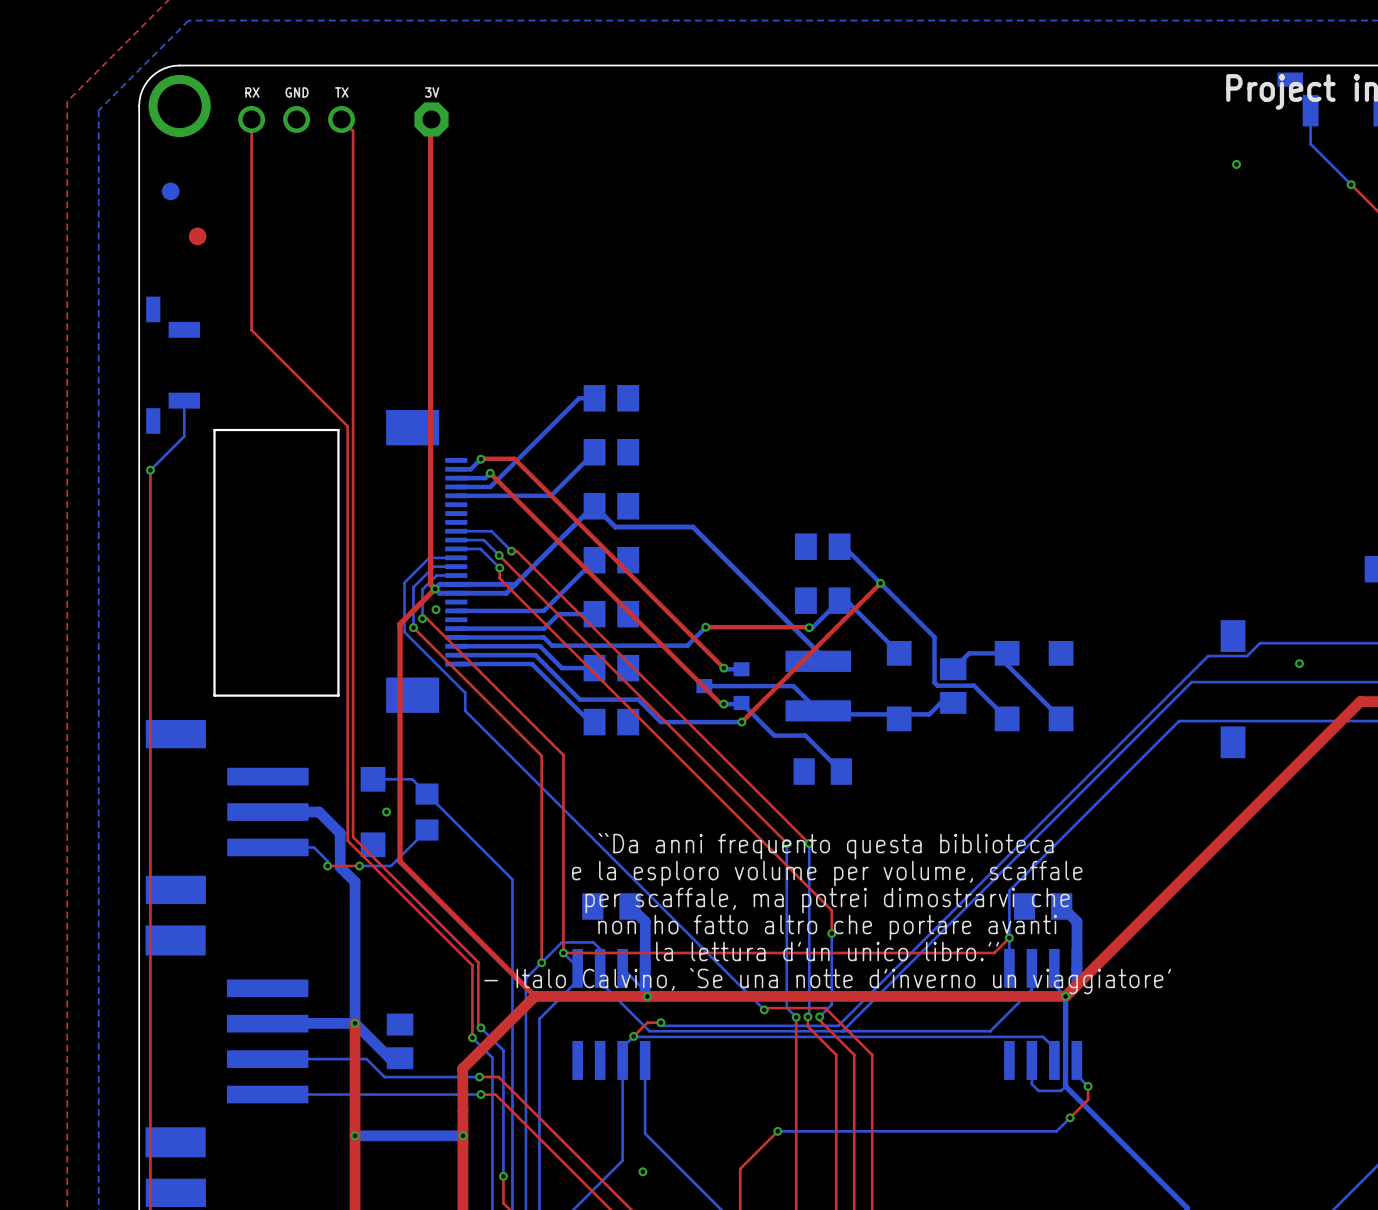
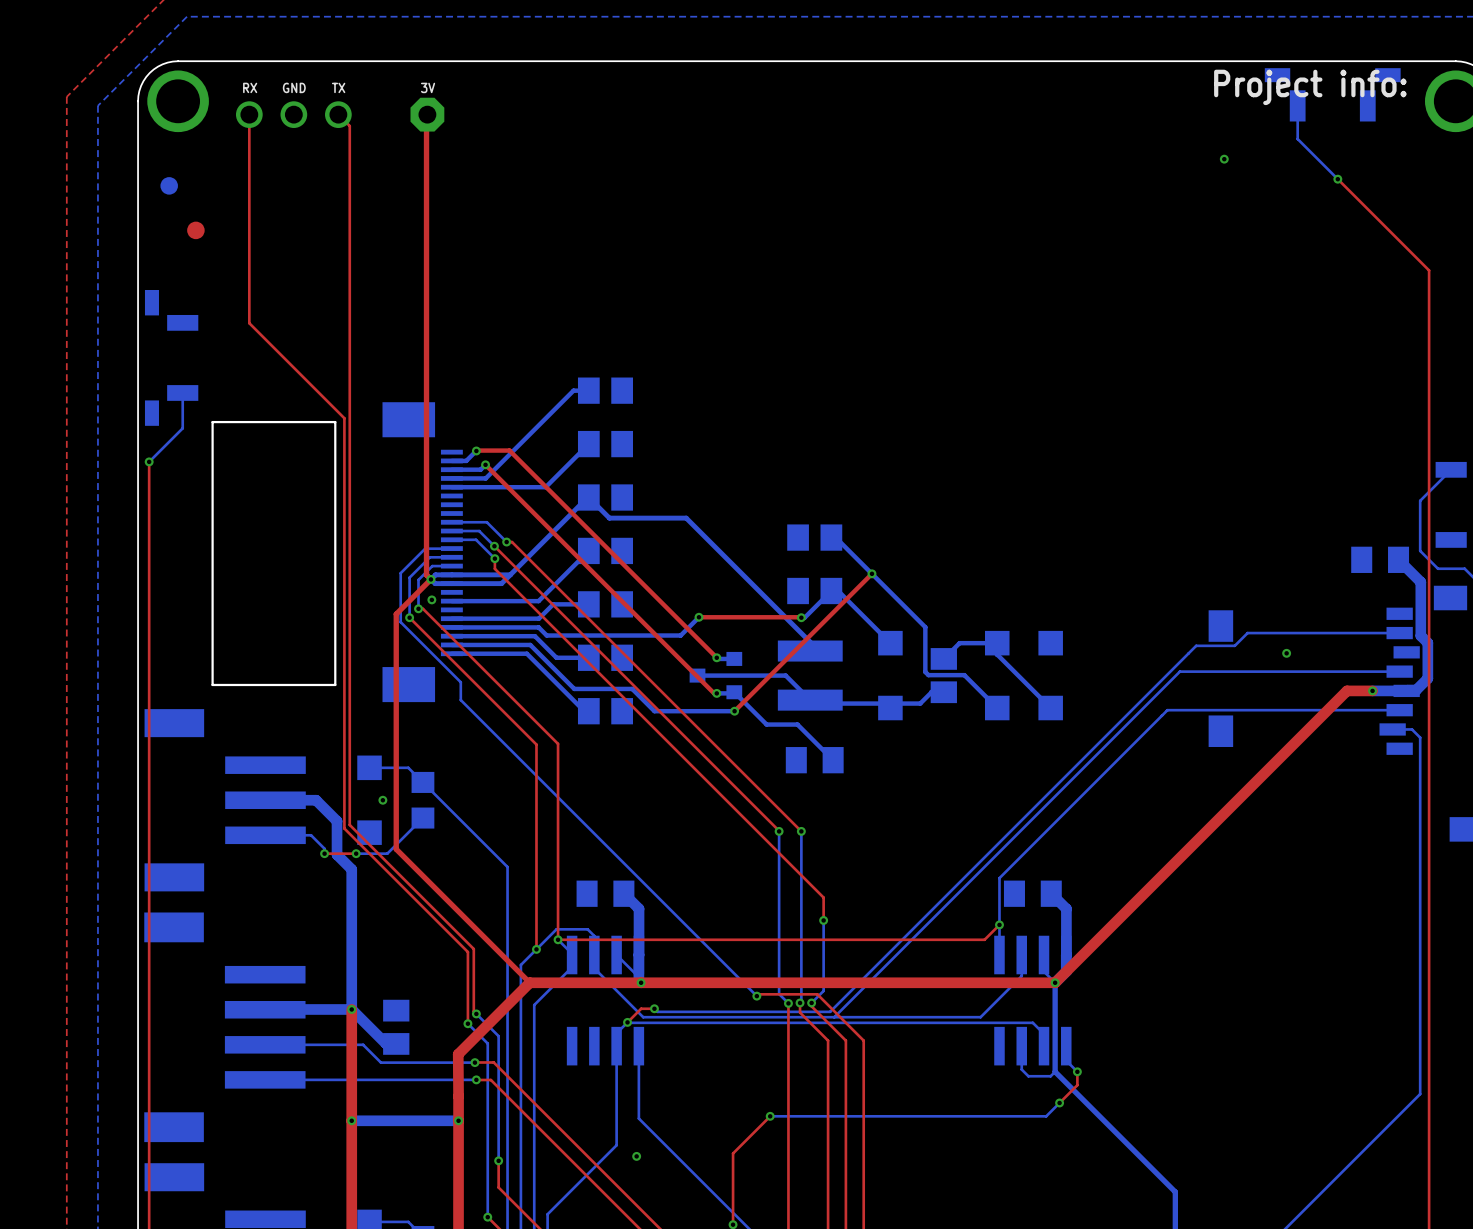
text: ``Da anni frequento questa biblioteca (826, 846) -> none
text: e la esploro volume per volume, scaffale (827, 873) -> none
text: per scaffale, ma potrei dimostrarvi che (827, 900) -> none
text: non ho fatto altro che portare avanti (827, 927) -> none
text: la lettura d'un unico libro.'' (827, 951) -> none
text: - Italo Calvino, `Se una notte d'inverno un viaggiatore' (827, 981) -> none

